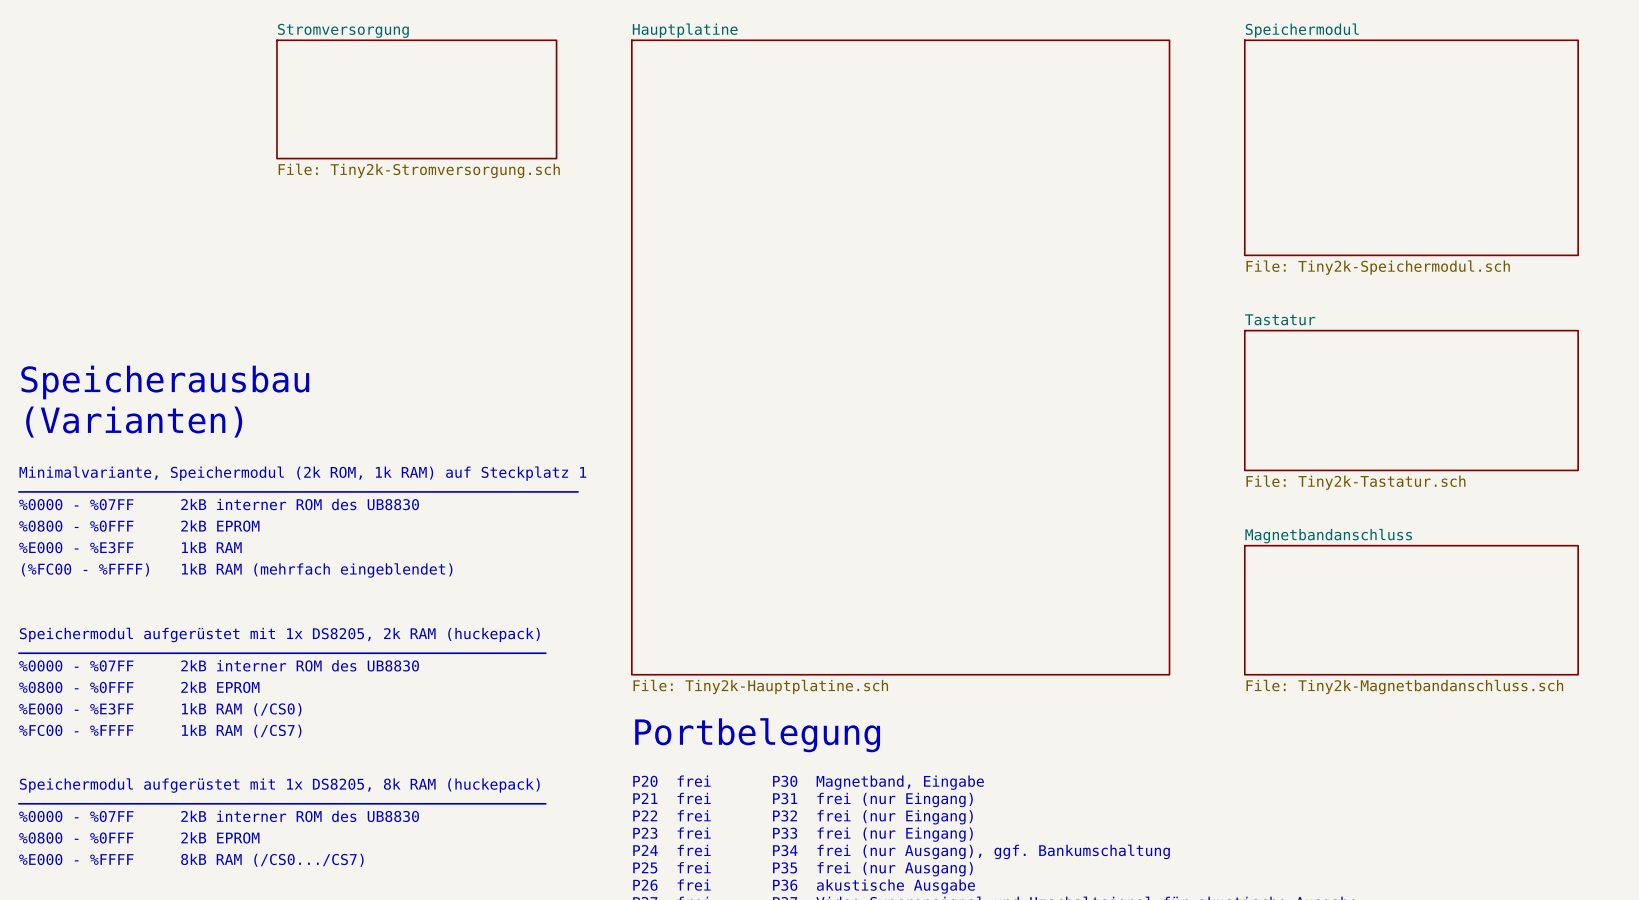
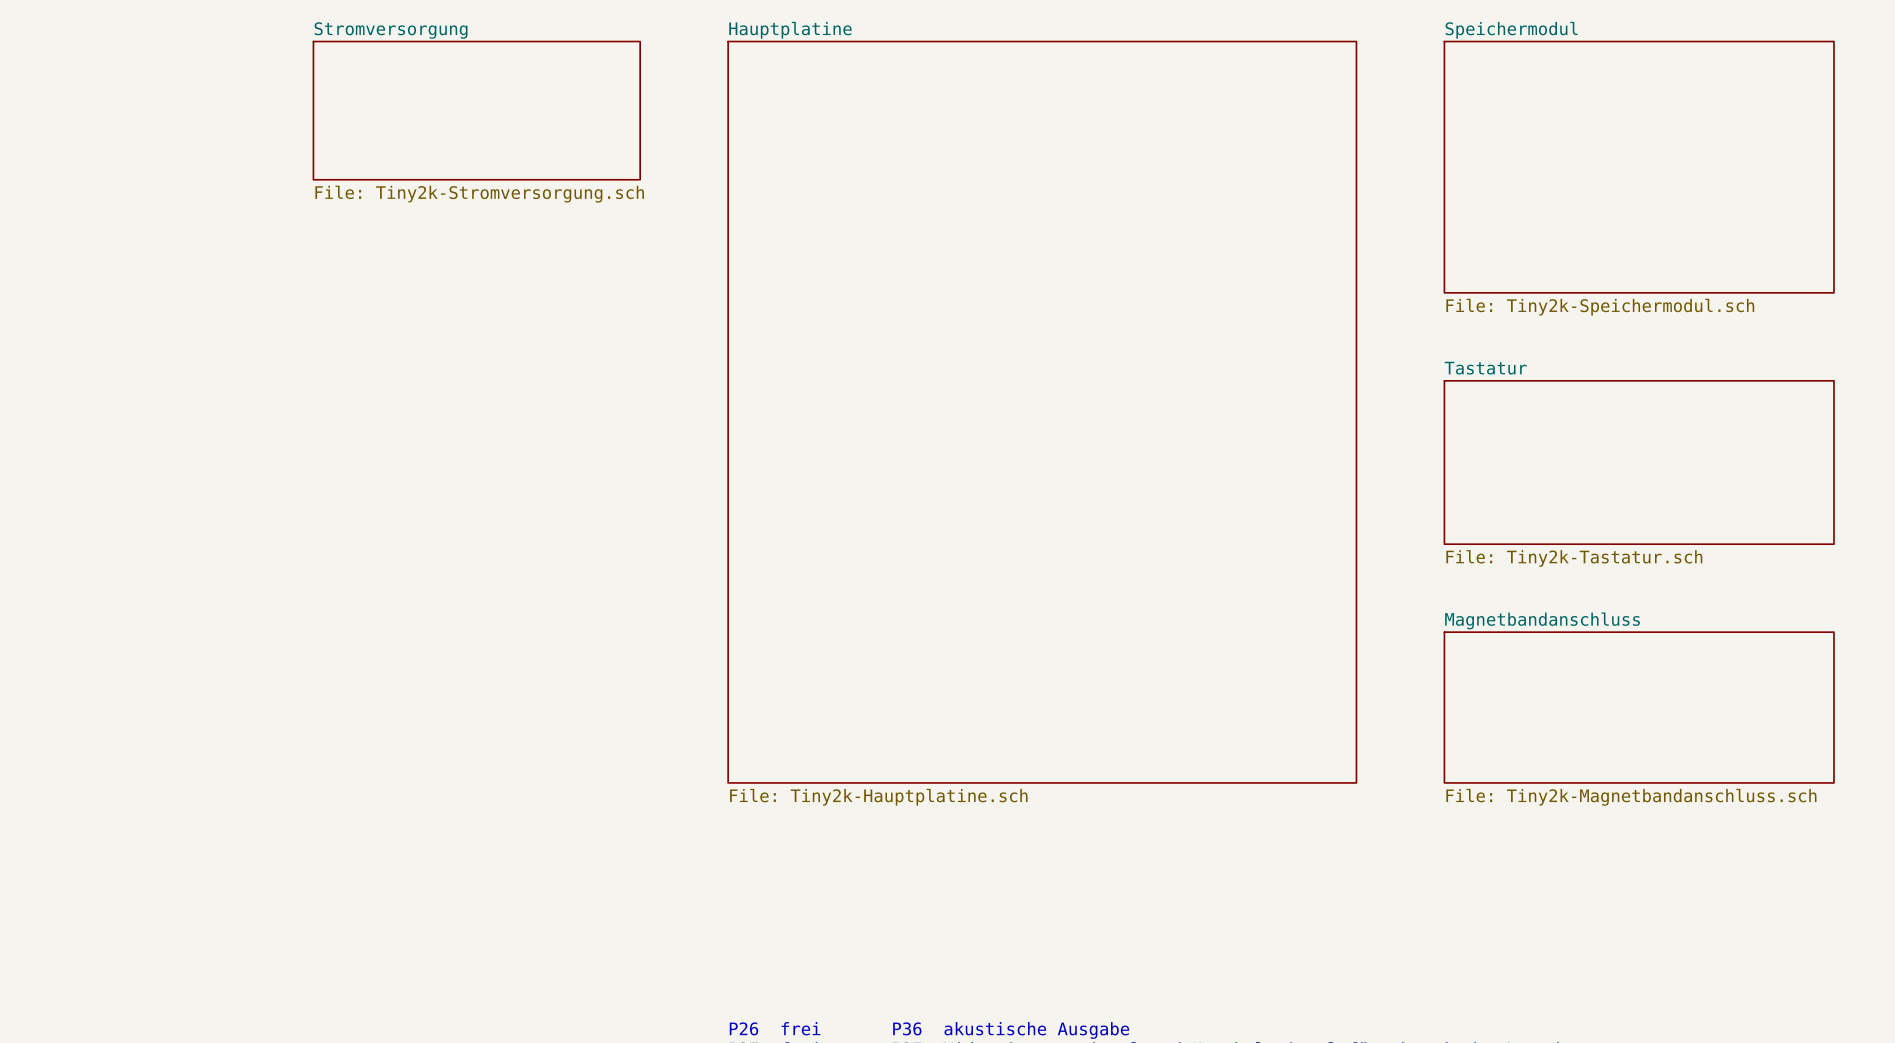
text: Speicherausbau (165, 382) -> none
text: (Varianten) (134, 422) -> none
text: Minimalvariante, Speichermodul (2k ROM, 1k RAM) auf Steckplatz 1 (302, 473) -> none
bus: (18, 491) (578, 491) -> none
text: %0000 - %07FF (76, 504) -> none
text: 2kB interner ROM des UB8830 (300, 504) -> none
text: %0800 - %0FFF (76, 526) -> none
text: 2kB EPROM (220, 526) -> none
text: %E000 - %E3FF (76, 547) -> none
text: 1kB RAM (211, 547) -> none
text: (%FC00 - %FFFF) (85, 569) -> none
text: 1kB RAM (mehrfach eingeblendet) (317, 570) -> none
text: Speichermodul aufgerüstet mit 1x DS8205, 2k RAM (huckepack) (279, 634) -> none
bus: (18, 653) (545, 653) -> none
text: %0000 - %07FF (76, 665) -> none
text: 2kB interner ROM des UB8830 (300, 665) -> none
text: %0800 - %0FFF (76, 687) -> none
text: 2kB EPROM (220, 687) -> none
text: %E000 - %E3FF (76, 708) -> none
text: 1kB RAM (/CS0) (241, 709) -> none
text: %FC00 - %FFFF (76, 730) -> none
text: 1kB RAM (/CS7) (241, 731) -> none
text: Portbelegung (757, 735) -> none
text: P20 frei (672, 781) -> none
text: P30 Magnetband, Eingabe (878, 782) -> none
text: Speichermodul aufgerüstet mit 1x DS8205, 8k RAM (huckepack) (279, 785) -> none
text: P21 frei (672, 798) -> none
text: P31 frei (nur Eingang) (872, 799) -> none
bus: (18, 803) (545, 803) -> none
text: P22 frei (672, 815) -> none
text: %0000 - %07FF (76, 816) -> none
text: 2kB interner ROM des UB8830 (300, 816) -> none
text: P32 frei (nur Eingang) (872, 817) -> none
text: P23 frei (672, 833) -> none
text: P33 frei (nur Eingang) (872, 834) -> none
text: %0800 - %0FFF (76, 837) -> none
text: 2kB EPROM (220, 837) -> none
text: P24 frei (672, 850) -> none
text: P34 frei (nur Ausgang), ggf. Bankumschaltung (971, 851) -> none
text: %E000 - %FFFF (76, 859) -> none
text: 8kB RAM (/CS0.../CS7) (272, 860) -> none
text: P25 frei (672, 867) -> none
text: P35 frei (nur Ausgang) (872, 869) -> none

